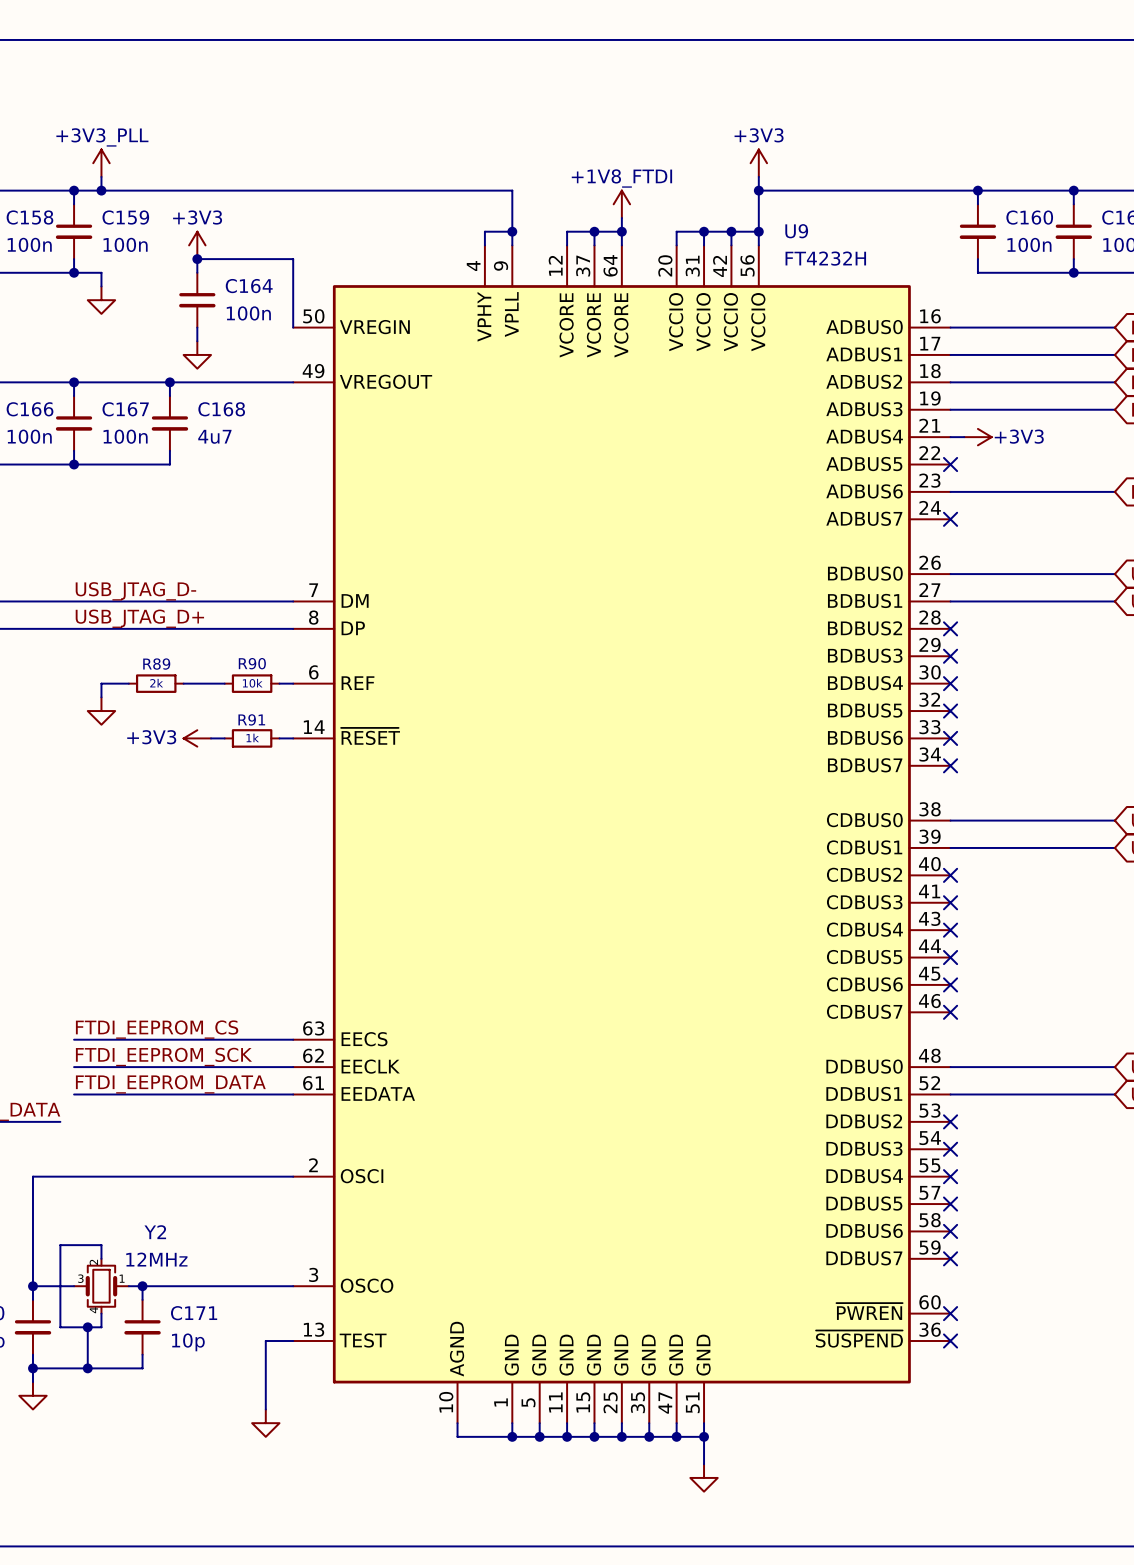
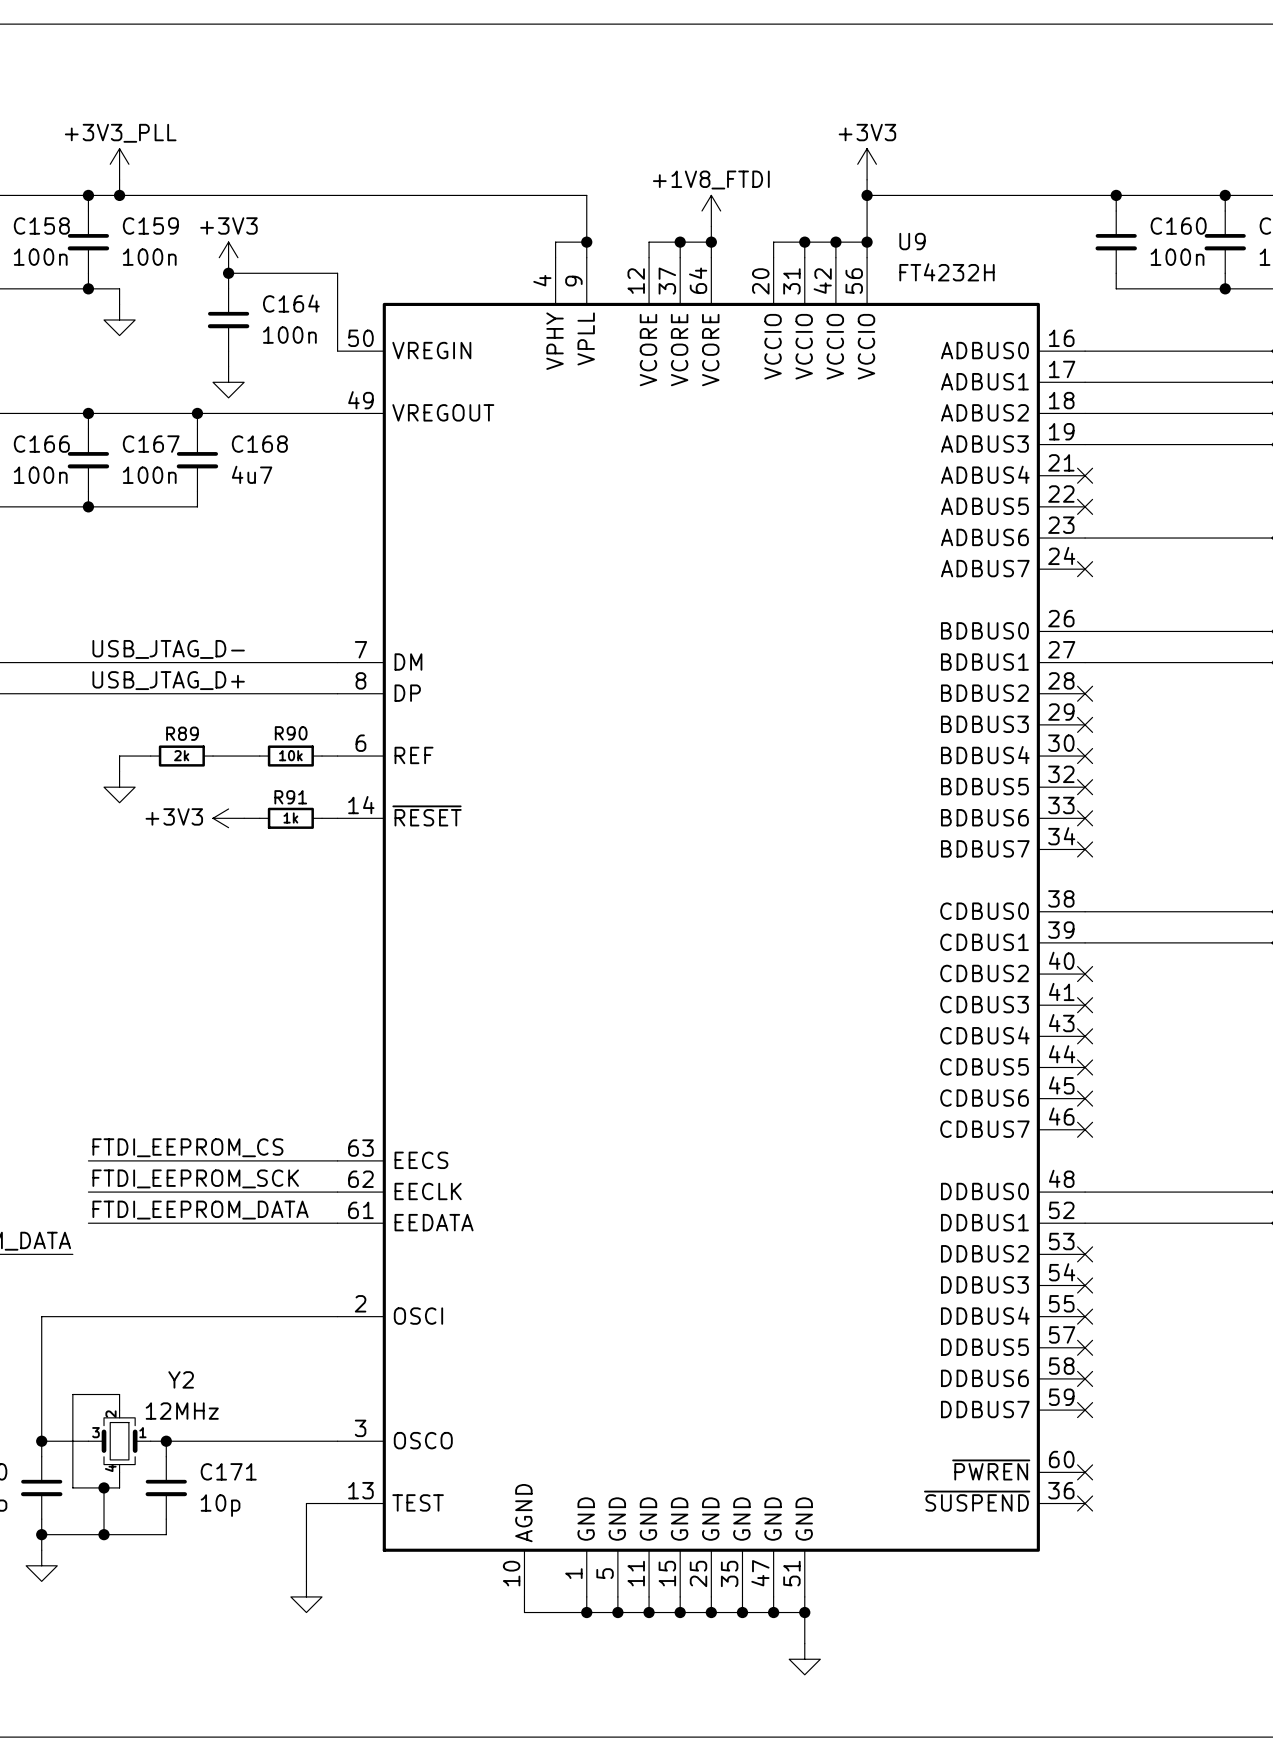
wire: (950, 437) (964, 437) -> none
no-connect mark: none -> (1085, 475)
power symbol: +3V3 (977, 437) -> none

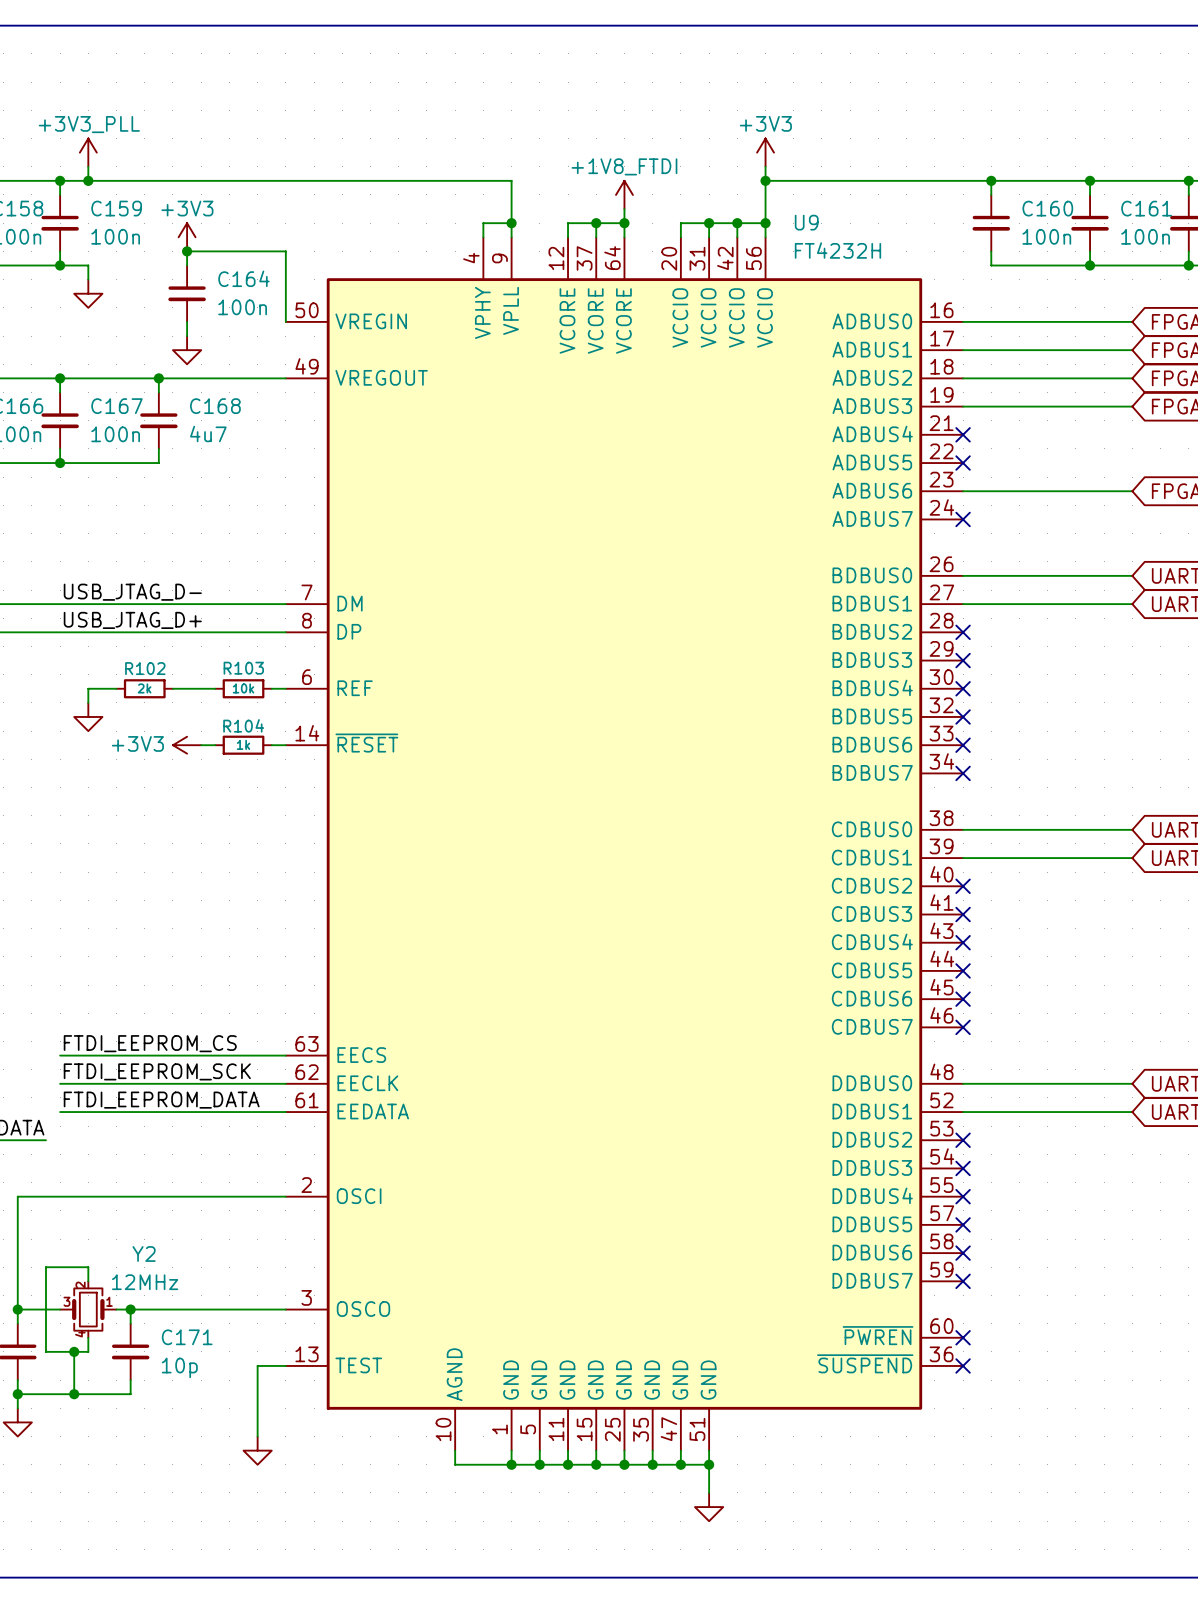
R89 name: R89 (182, 733) -> R102 (145, 668)
R90 name: R90 (291, 733) -> R103 (243, 668)
R91 name: R91 (290, 797) -> R104 (243, 725)

